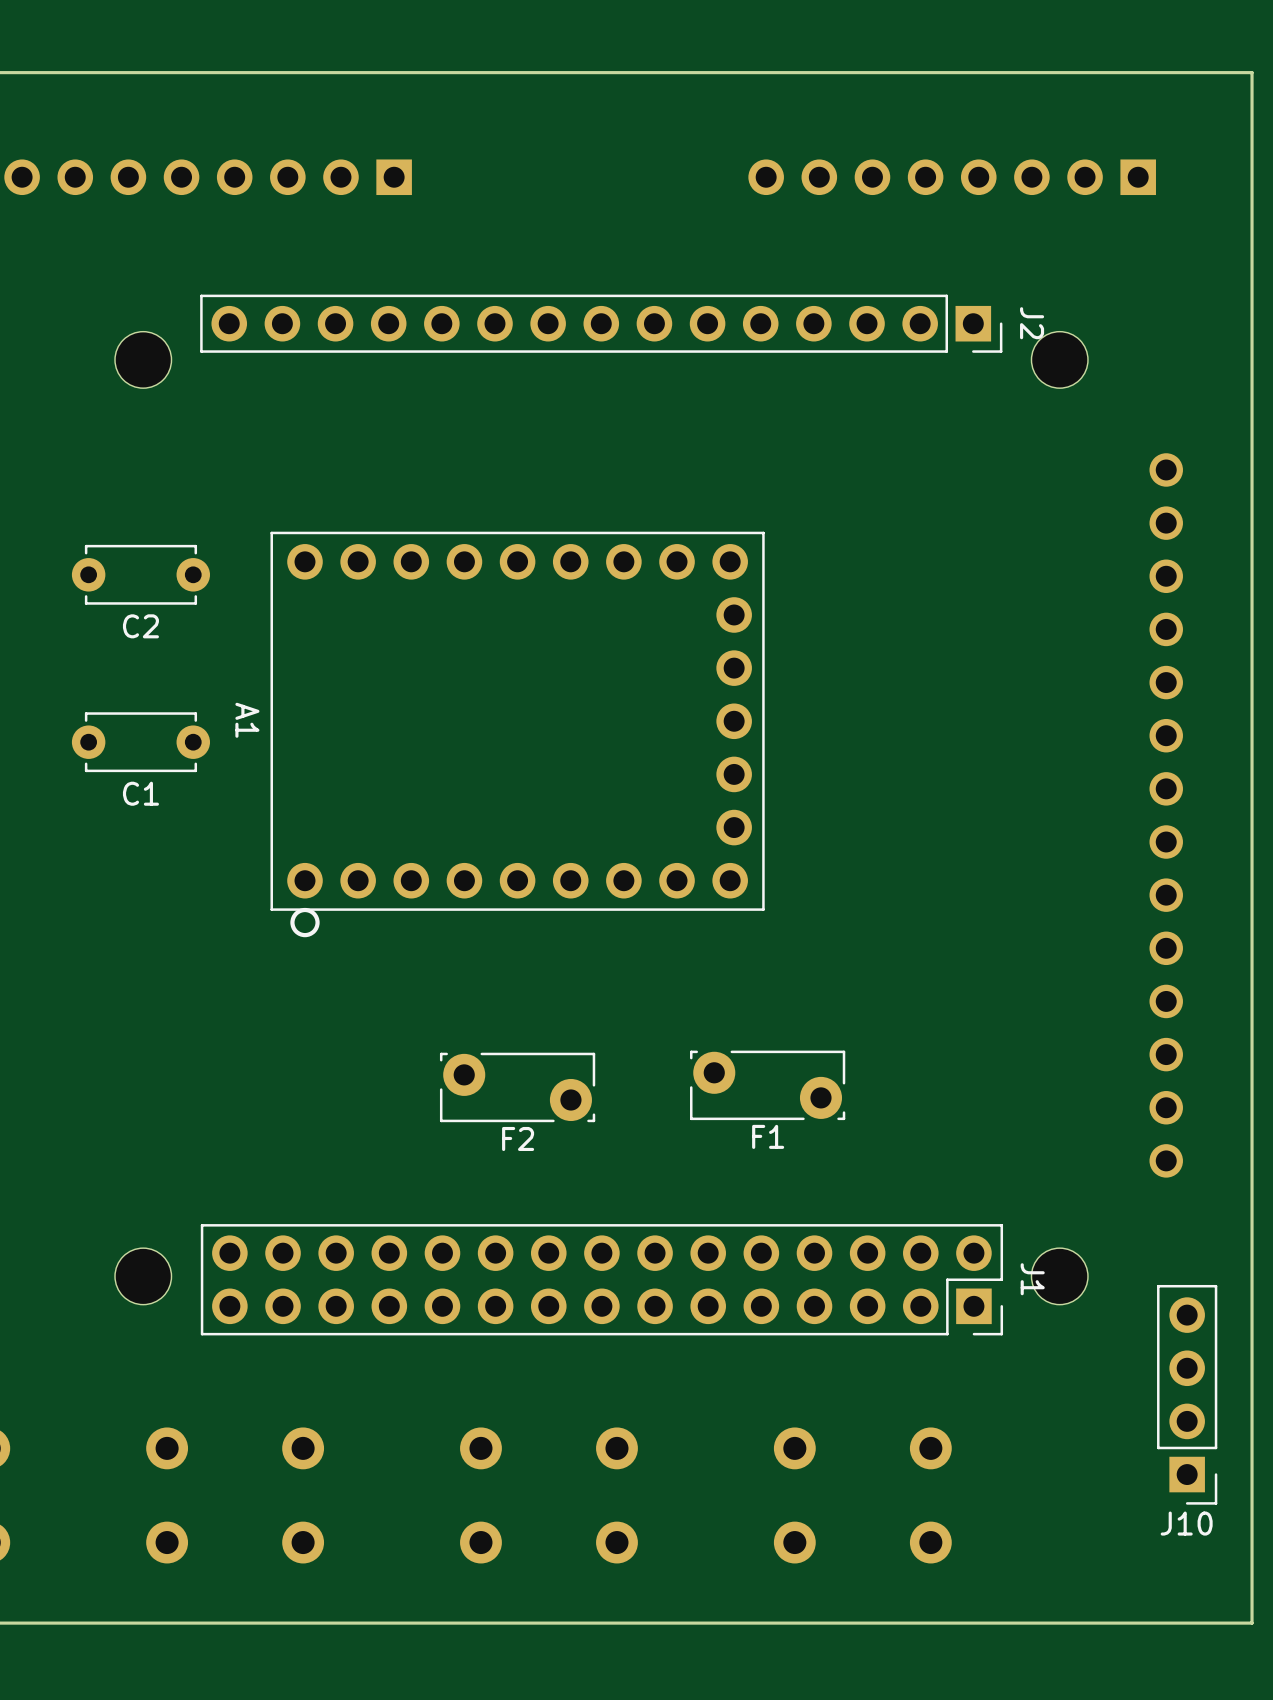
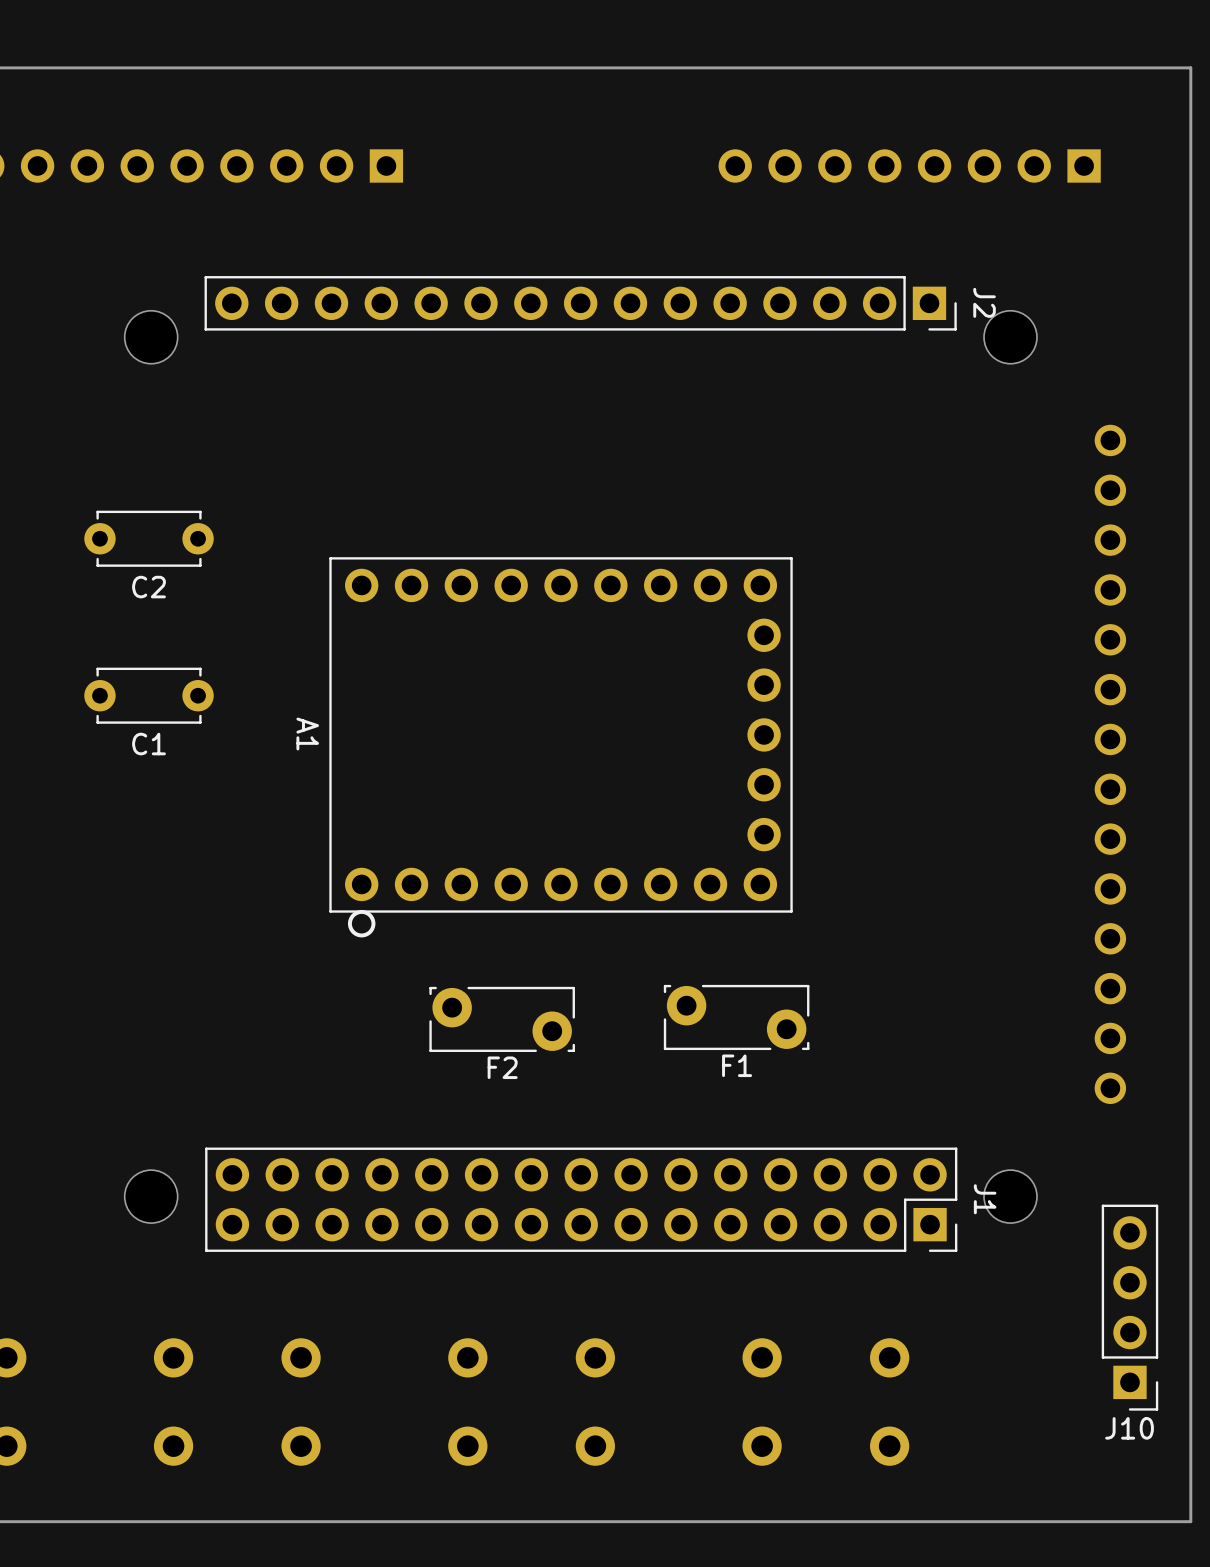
A1 position: (517, 734) -> (561, 747)

